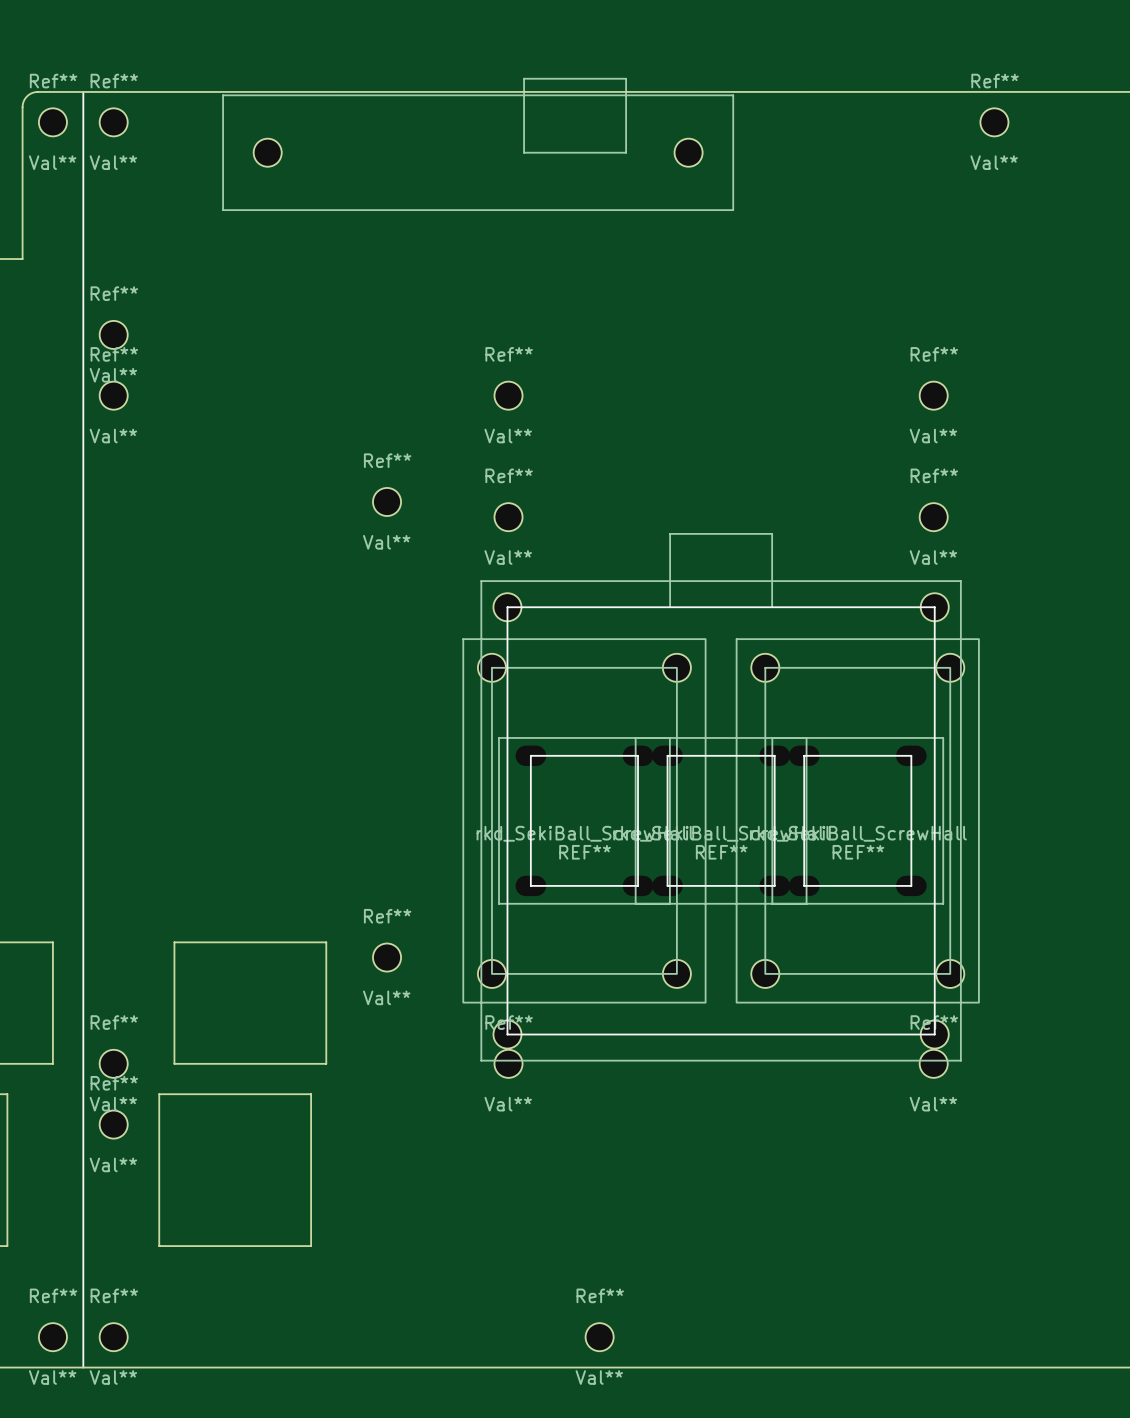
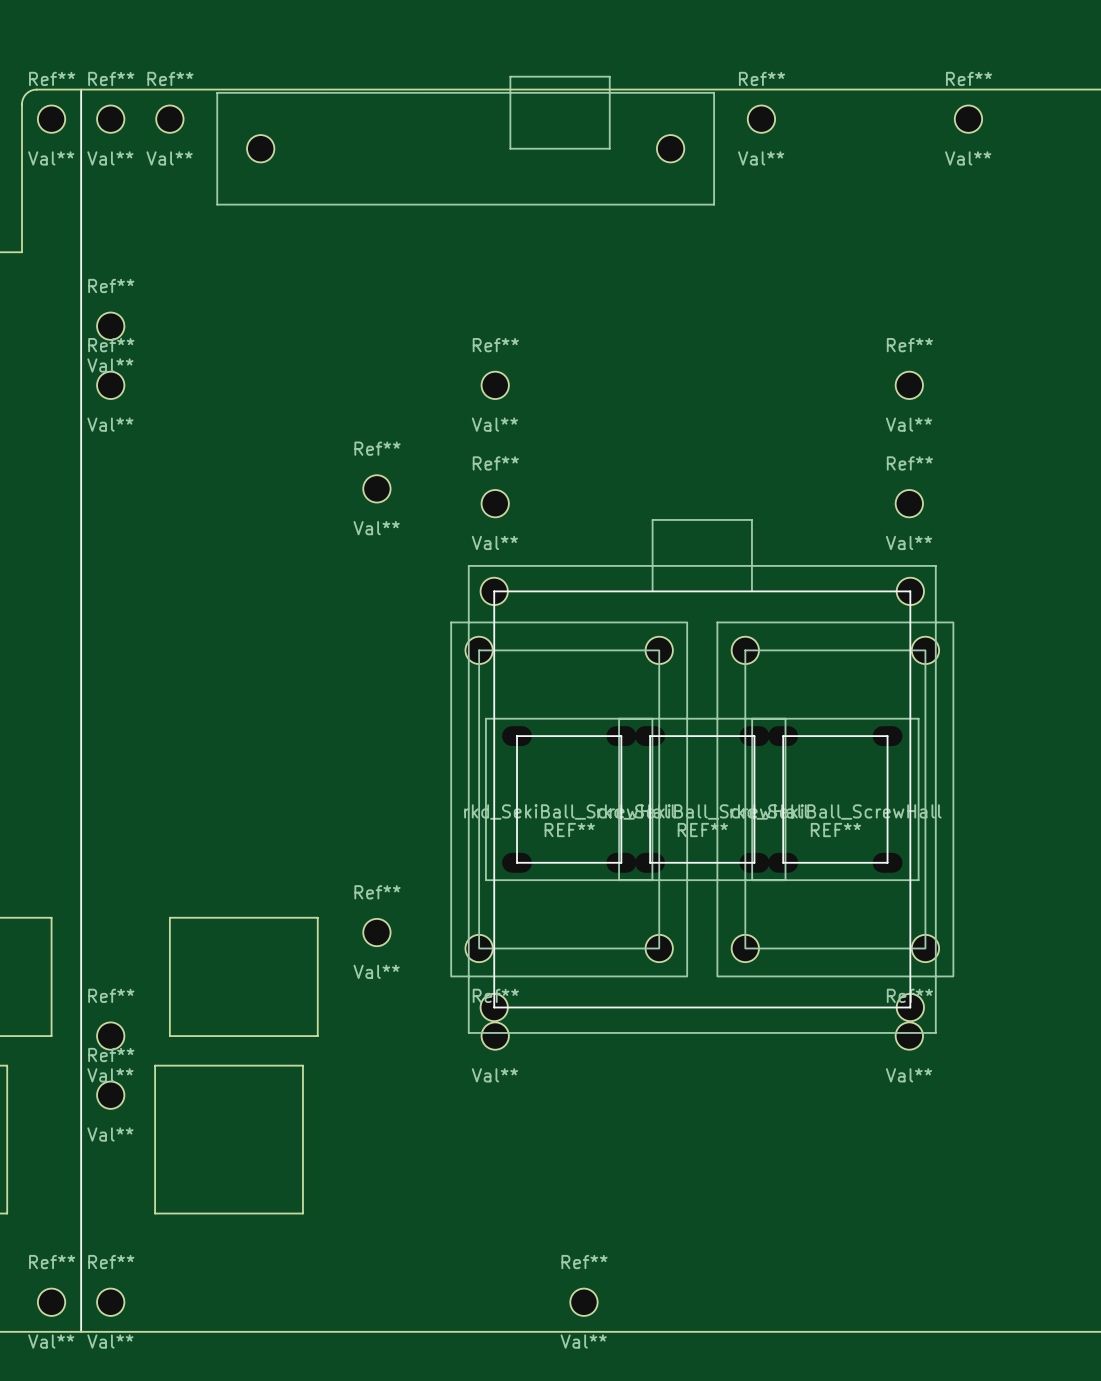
Ref**: none -> Val** (169, 119)
Ref**: none -> Val** (761, 119)

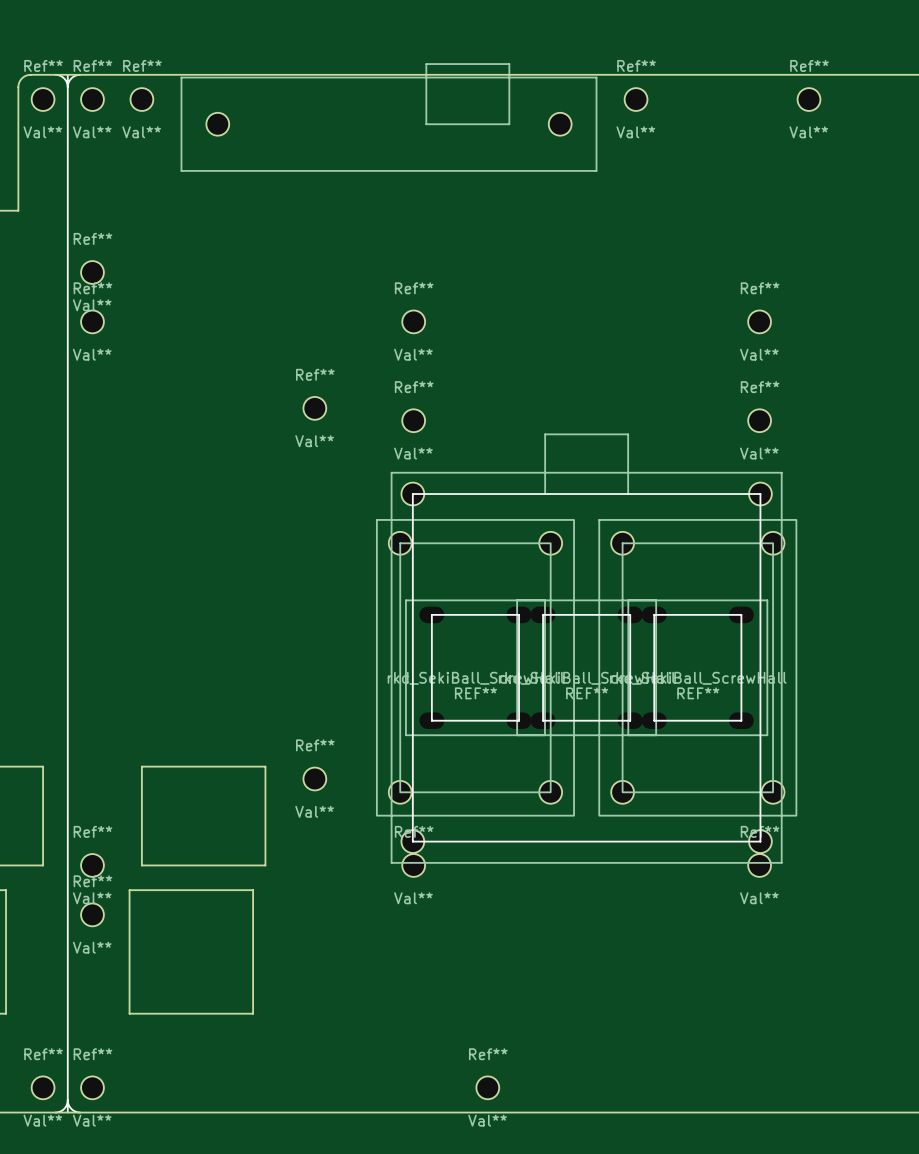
line: none -> (55, 74) (64, 78) (67, 87) (71, 78) (80, 74)
line: none -> (55, 1112) (64, 1108) (67, 1100) (71, 1108) (80, 1112)

